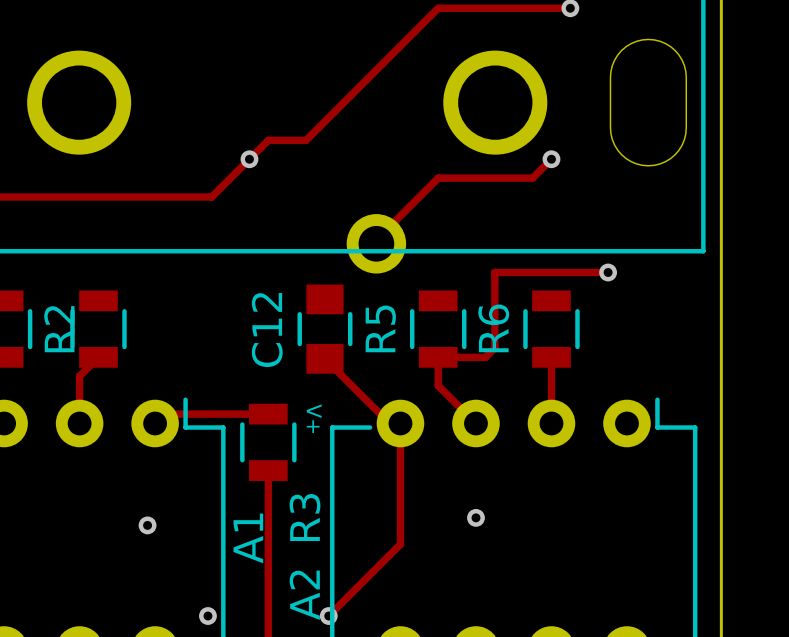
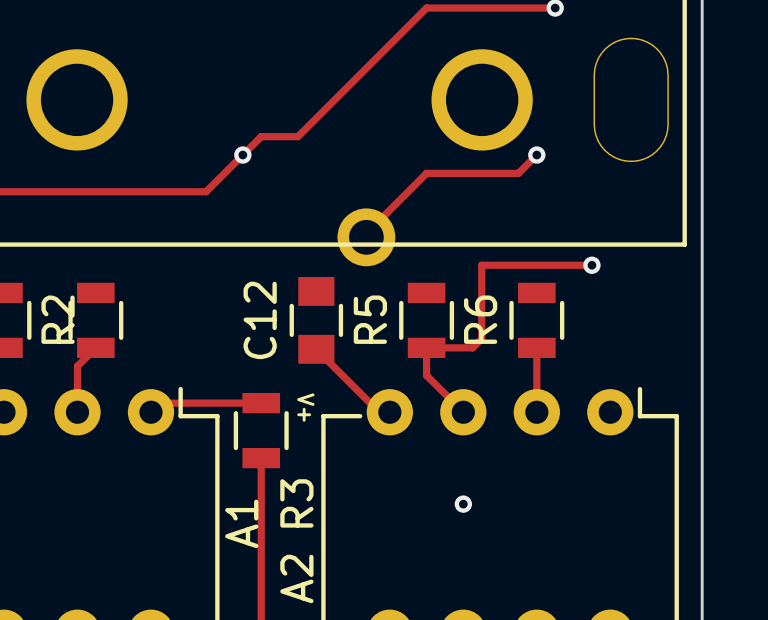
track: (400, 423) (400, 544) (328, 616) -> none
via: (147, 525) -> none
via: (207, 616) -> none
via: (328, 616) -> none

